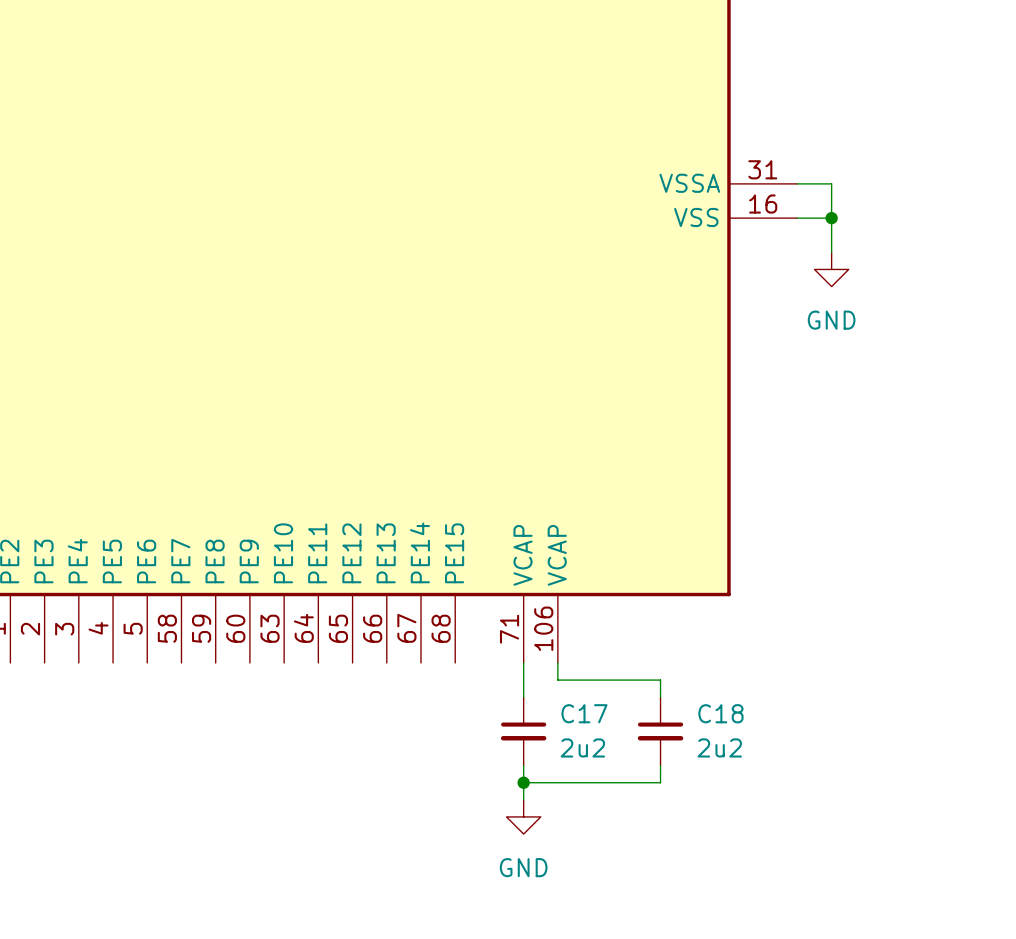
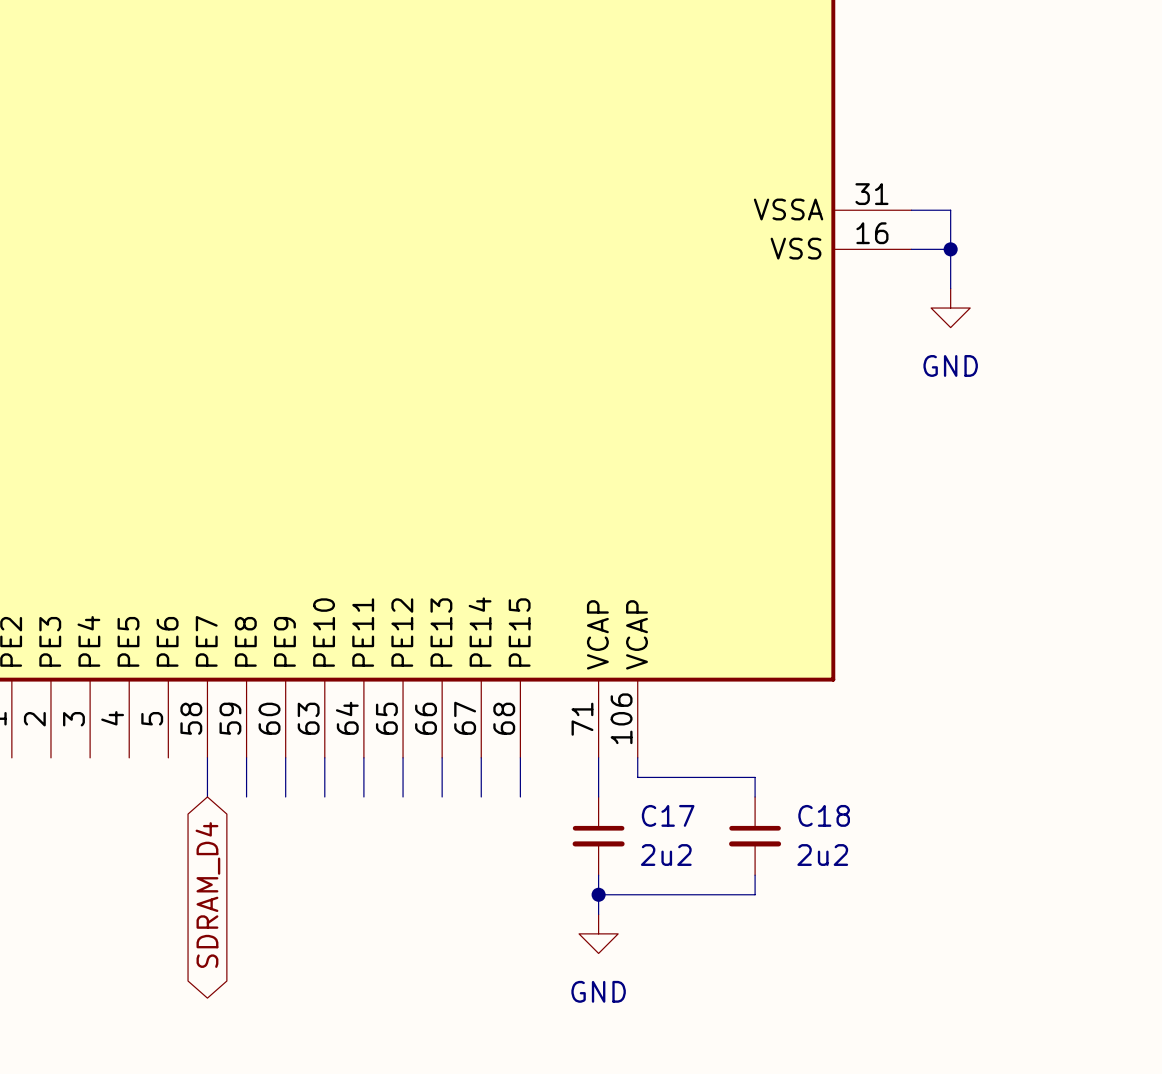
wire: none -> (207, 757) (207, 796)
wire: none -> (246, 757) (246, 796)
wire: none -> (285, 757) (285, 796)
wire: none -> (324, 757) (324, 796)
wire: none -> (363, 757) (363, 796)
wire: none -> (403, 757) (403, 796)
wire: none -> (442, 757) (442, 796)
wire: none -> (481, 757) (481, 796)
wire: none -> (520, 757) (520, 796)
global label: none -> SDRAM_D4 (207, 895)

